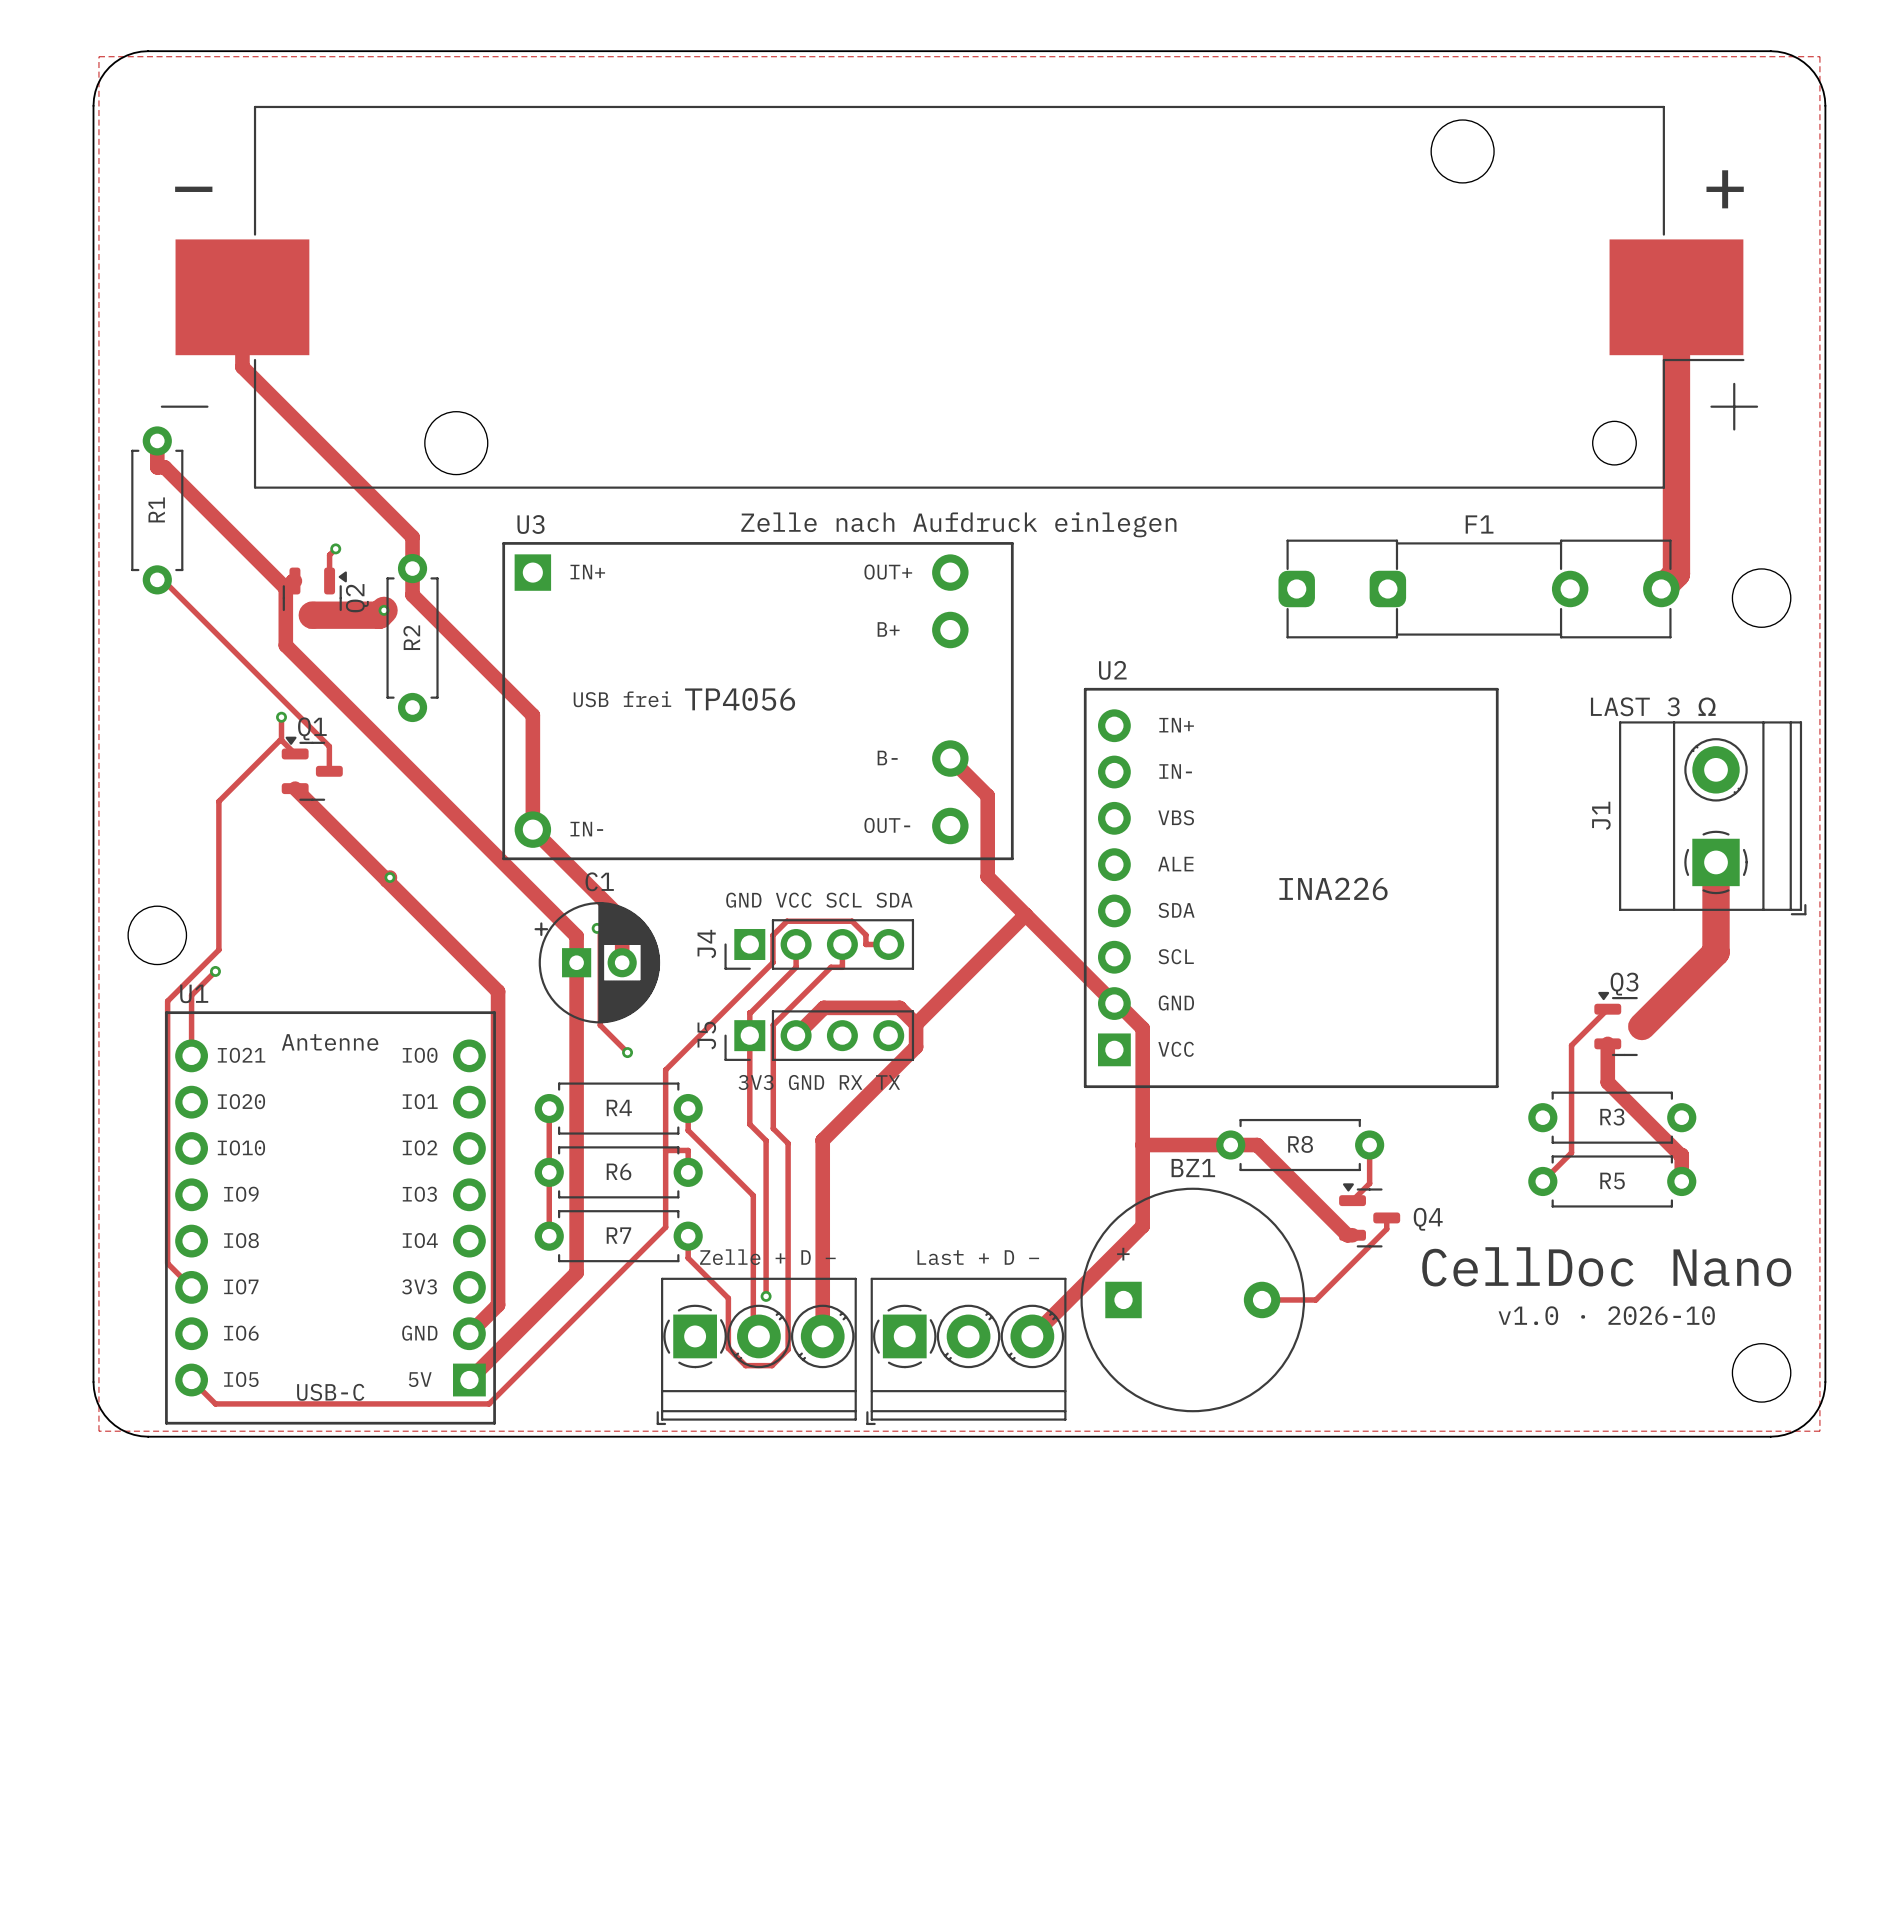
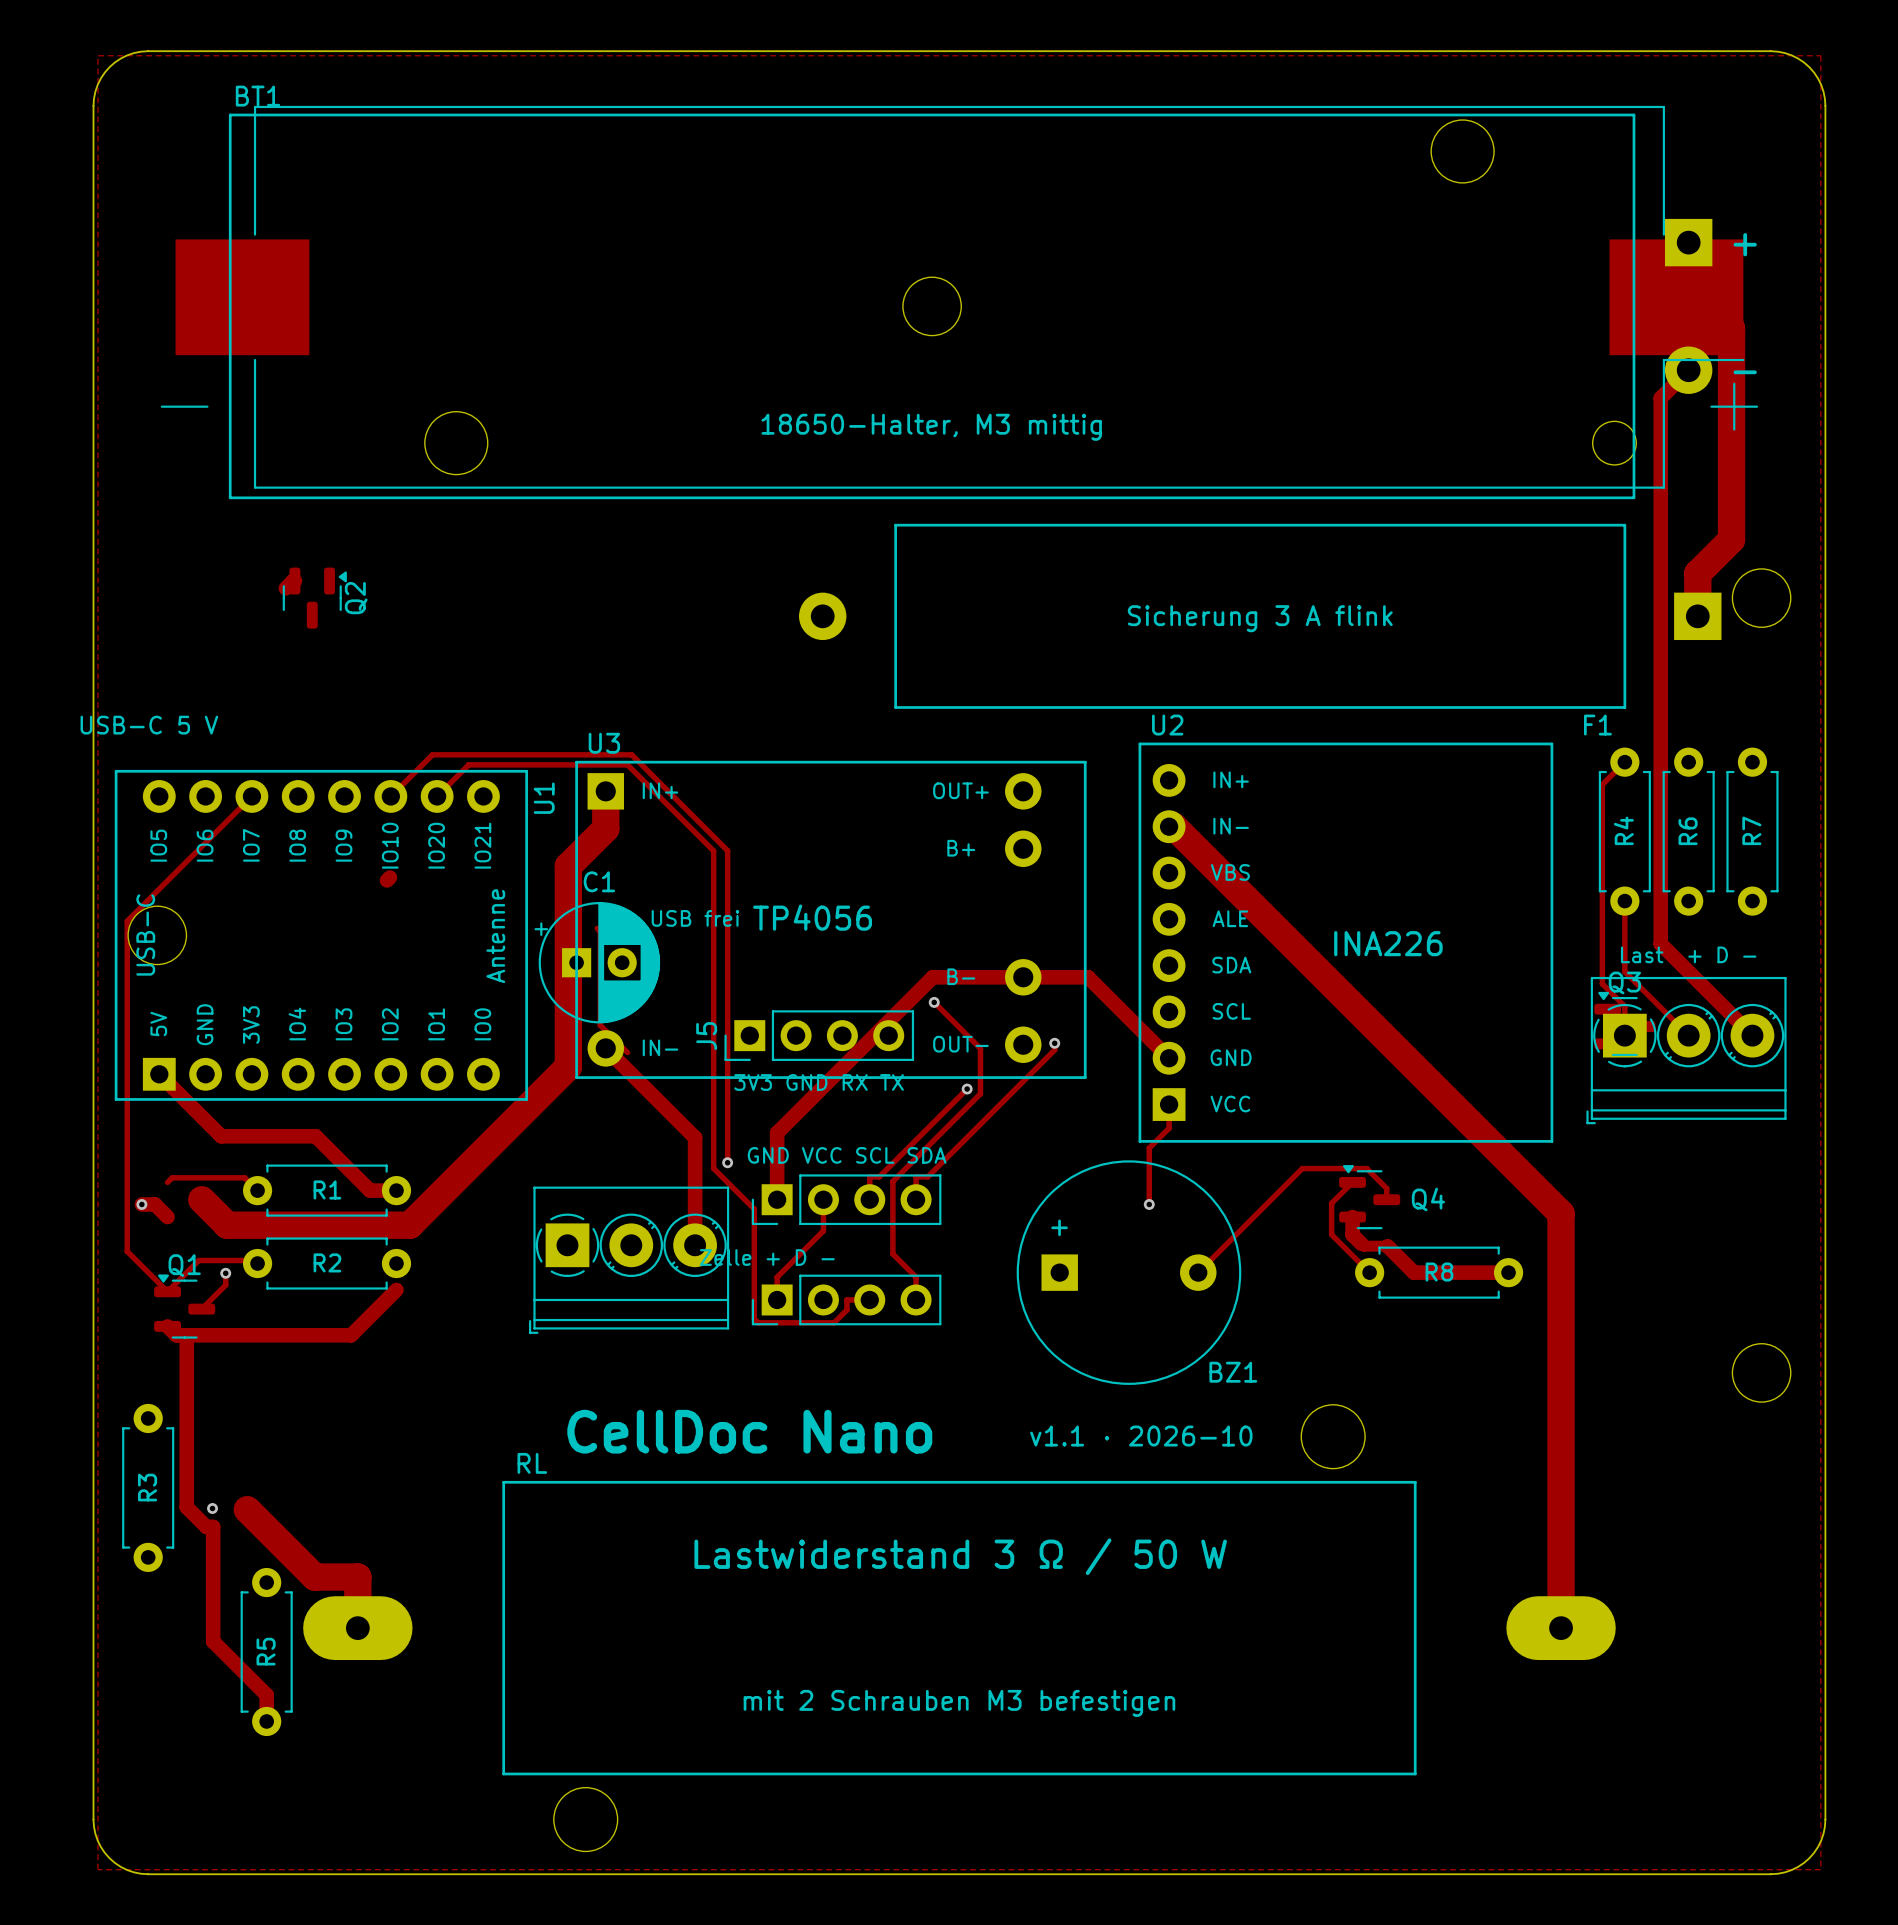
zone outline: (98, 56) (1819, 56) (1819, 1431) (98, 1431) (98, 56) -> (98, 55) (98, 1869) (1820, 1869) (1820, 55) (98, 55)
text: − (193, 189) -> none
text: + (1725, 189) -> none
track: none -> (1688, 242) (1688, 285) (1731, 328) (1731, 539) (1697, 573) (1697, 616)
track: (242, 297) (242, 367) (412, 537) (412, 595) (532, 715) (532, 829) (622, 918) (622, 962) -> none
track: (1676, 297) (1676, 573) (1661, 588) -> none
BT1: none -> (970, 306)
track: none -> (1688, 370) (1660, 398) (1660, 943) (1752, 1035)
track: (157, 440) (157, 467) (164, 467) (285, 588) (285, 645) (576, 936) (576, 1272) (469, 1380) -> none
R1 rotation: 0° (157, 510) -> 90° clockwise (327, 1190)
R1 position: (157, 510) -> (327, 1190)
text: Zelle nach Aufdruck einlegen (958, 524) -> none
F1 name position: F1 (1479, 524) -> F1 (1597, 725)
F1 footprint: [1278, 539, 1680, 639] -> [799, 523, 1722, 709]
track: (335, 548) (329, 555) (329, 581) -> none
via: (335, 548) -> none
track: (157, 579) (162, 579) (329, 746) (329, 771) -> none
track: (384, 610) (379, 615) (312, 615) -> none
via: (384, 610) -> none
R2 rotation: 0° (412, 638) -> 90° clockwise (327, 1263)
R2 position: (412, 638) -> (327, 1263)
U3 position: (758, 701) -> (830, 919)
text: LAST 3 Ω (1653, 706) -> none
track: (281, 717) (281, 740) -> none
via: (281, 717) -> none
text: none -> USB-C 5 V (149, 725)
track: (281, 740) (295, 753) -> none
track: (281, 740) (218, 801) (218, 949) (167, 1001) (167, 1263) (191, 1287) -> none
track: (950, 758) (987, 795) (987, 876) (1088, 977) -> (777, 1199) (777, 1132) (932, 977) (1088, 977)
track: none -> (1624, 762) (1602, 784) (1602, 983) (1624, 1006) (1624, 1035)
Q1 position: (312, 768) -> (184, 1306)
track: (295, 788) (498, 991) (498, 1305) (469, 1333) -> none
track: none -> (605, 791) (605, 828) (568, 866) (568, 1066) (409, 1225) (227, 1225) (201, 1199)
track: none -> (251, 796) (127, 921) (127, 1251) (167, 1291) (198, 1260) (254, 1260) (257, 1263)
track: none -> (390, 796) (432, 754) (631, 754) (727, 850) (727, 1162)
track: none -> (437, 796) (468, 764) (627, 764) (713, 850) (713, 1168) (754, 1209) (754, 1319) (758, 1322) (834, 1322) (846, 1309) (846, 1299) (869, 1299)
J1: (1712, 818) -> none
track: none -> (1169, 826) (1174, 826) (1561, 1213) (1561, 1628)
track: (1716, 862) (1716, 952) (1641, 1026) -> none
via: (389, 877) -> none
U2 position: (1291, 887) -> (1345, 942)
text position: GND VCC SCL SDA (819, 900) -> GND VCC SCL SDA (847, 1155)
track: none -> (1624, 901) (1624, 971) (1688, 1035)
track: (1025, 914) (916, 1024) -> none
via: (597, 928) -> none
track: (796, 944) (796, 967) (749, 1012) (749, 1124) (766, 1140) (766, 1296) -> none
J4: (819, 944) -> none
track: (842, 944) (842, 967) (831, 967) (773, 1025) (773, 1128) (788, 1143) (788, 1349) (772, 1365) (745, 1365) (728, 1348) (728, 1298) (688, 1258) (688, 1236) -> none
track: (888, 944) (865, 944) (865, 935) (852, 921) (787, 921) (772, 935) (772, 962) (665, 1069) (665, 1227) (489, 1403) (215, 1403) (191, 1380) -> none
text: none -> Last + D − (1688, 954)
track: (215, 971) (191, 995) (191, 1055) -> none
via: (215, 971) -> none
track: none -> (934, 1002) (980, 1048) (980, 1093) (892, 1181) (892, 1254) (916, 1277) (916, 1299)
via: none -> (934, 1002)
track: (1114, 1003) (1117, 1003) (1142, 1028) (1142, 1226) (1032, 1336) -> (1114, 1003) (1169, 1058)
track: (1607, 1009) (1571, 1045) (1571, 1152) (1542, 1181) -> none
track: (916, 1024) (916, 1046) (822, 1140) (822, 1336) -> none
track: (916, 1024) (899, 1007) (823, 1007) (796, 1035) -> none
track: none -> (1054, 1043) (1054, 1049) (927, 1176) (916, 1176) (916, 1199)
via: none -> (1054, 1043)
track: (1607, 1043) (1607, 1082) (1681, 1155) (1681, 1181) -> none
track: none -> (605, 1048) (695, 1137) (695, 1245)
part: none -> (1686, 1050)
via: (627, 1052) -> none
track: none -> (159, 1074) (221, 1136) (315, 1136) (370, 1190) (396, 1190)
track: none -> (967, 1089) (879, 1176) (869, 1176) (869, 1199)
via: none -> (967, 1089)
track: none -> (1169, 1104) (1169, 1128) (1149, 1148) (1149, 1204)
track: (549, 1108) (549, 1236) -> none
R4 rotation: 0° (618, 1108) -> 90° clockwise (1624, 831)
R4 position: (618, 1108) -> (1624, 831)
track: (688, 1108) (688, 1130) (753, 1195) (753, 1330) (758, 1336) -> none
R3 rotation: 0° (1612, 1117) -> 90° clockwise (148, 1487)
R3 position: (1612, 1117) -> (148, 1487)
track: (1142, 1145) (1257, 1145) (1347, 1235) (1352, 1235) -> none
R8 position: (1300, 1145) -> (1439, 1272)
track: (1369, 1145) (1369, 1183) (1352, 1200) -> none
track: (665, 1150) (688, 1150) (688, 1172) -> none
via: none -> (727, 1162)
BZ1 name position: BZ1 (1193, 1168) -> BZ1 (1233, 1372)
R6 rotation: 0° (618, 1172) -> 90° clockwise (1688, 831)
R6 position: (618, 1172) -> (1688, 831)
R5 rotation: 0° (1612, 1181) -> 90° clockwise (266, 1652)
R5 position: (1612, 1181) -> (266, 1652)
track: none -> (167, 1182) (172, 1177) (244, 1177) (257, 1190)
track: none -> (1352, 1182) (1331, 1203) (1331, 1234) (1369, 1272)
track: none -> (823, 1199) (823, 1230) (777, 1277) (777, 1299)
part: none -> (846, 1199)
track: none -> (1386, 1199) (1386, 1188) (1366, 1168) (1302, 1168) (1198, 1272)
track: none -> (141, 1204) (155, 1204) (167, 1217)
via: none -> (141, 1204)
via: none -> (1149, 1204)
Q4 position: (1369, 1215) -> (1369, 1197)
U1 rotation: 0° (330, 1217) -> 90° clockwise (321, 935)
U1 position: (330, 1217) -> (321, 935)
track: none -> (1352, 1217) (1352, 1234) (1363, 1246) (1387, 1246) (1414, 1272) (1508, 1272)
track: (1386, 1217) (1386, 1229) (1315, 1299) (1262, 1299) -> none
R7 rotation: 0° (618, 1236) -> 90° clockwise (1752, 831)
R7 position: (618, 1236) -> (1752, 831)
text: Last + D − (978, 1257) -> none
text: CellDoc Nano (1606, 1266) -> none
track: none -> (225, 1273) (225, 1285) (201, 1309)
via: none -> (225, 1273)
track: none -> (396, 1289) (351, 1335) (176, 1335) (167, 1326)
via: (766, 1296) -> none
part: none -> (846, 1299)
BZ1 position: (1192, 1299) -> (1128, 1272)
text: v1.0 · 2026-10 (1606, 1315) -> none
track: none -> (186, 1335) (186, 1507) (206, 1526) (213, 1526) (213, 1641) (266, 1695) (266, 1721)
part position: (756, 1351) -> (629, 1260)
part: (966, 1351) -> none
board edge: (93, 1382) (97, 1402) (109, 1420) (127, 1432) (148, 1436) (1770, 1436) (1791, 1432) (1809, 1420) (1821, 1402) (1825, 1382) -> (93, 1382) (93, 1826) (100, 1846) (109, 1858) (127, 1870) (148, 1874) (1770, 1874) (1784, 1872) (1798, 1866) (1809, 1858) (1821, 1840) (1824, 1826) (1825, 1382)
text: none -> CellDoc Nano (749, 1431)
text: none -> v1.1 · 2026-10 (1141, 1436)
via: none -> (212, 1508)
track: none -> (247, 1509) (314, 1577) (357, 1577) (357, 1628)
RL: none -> (959, 1628)

